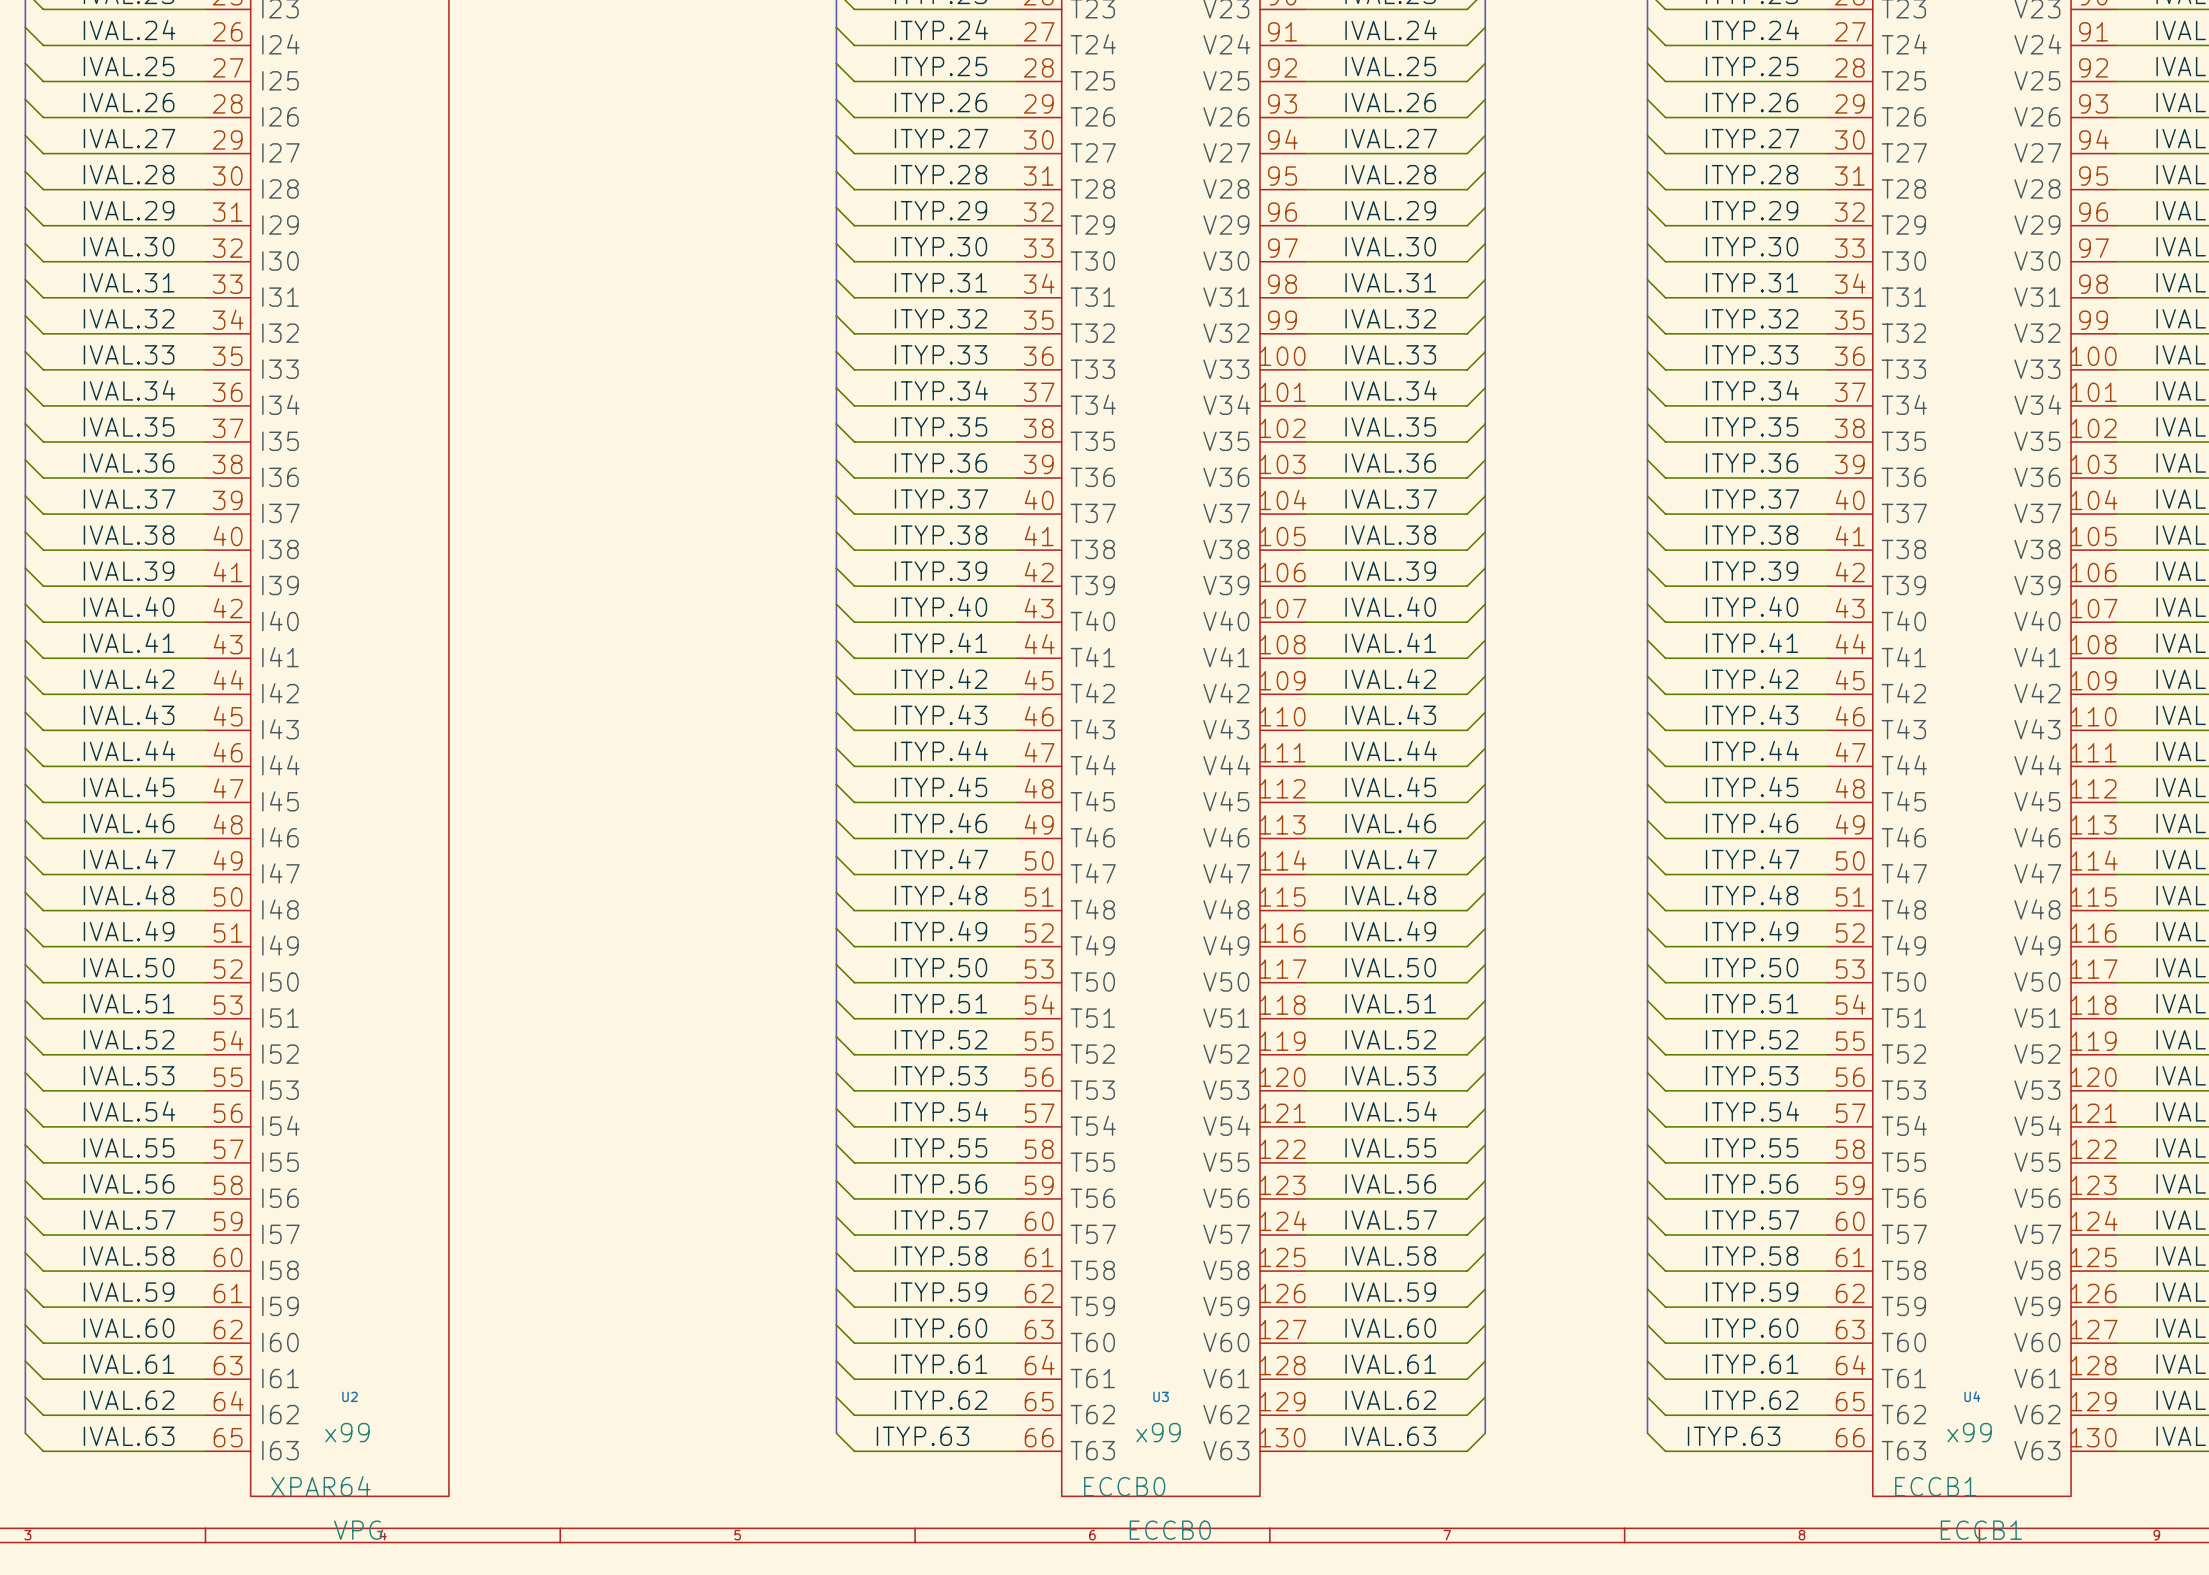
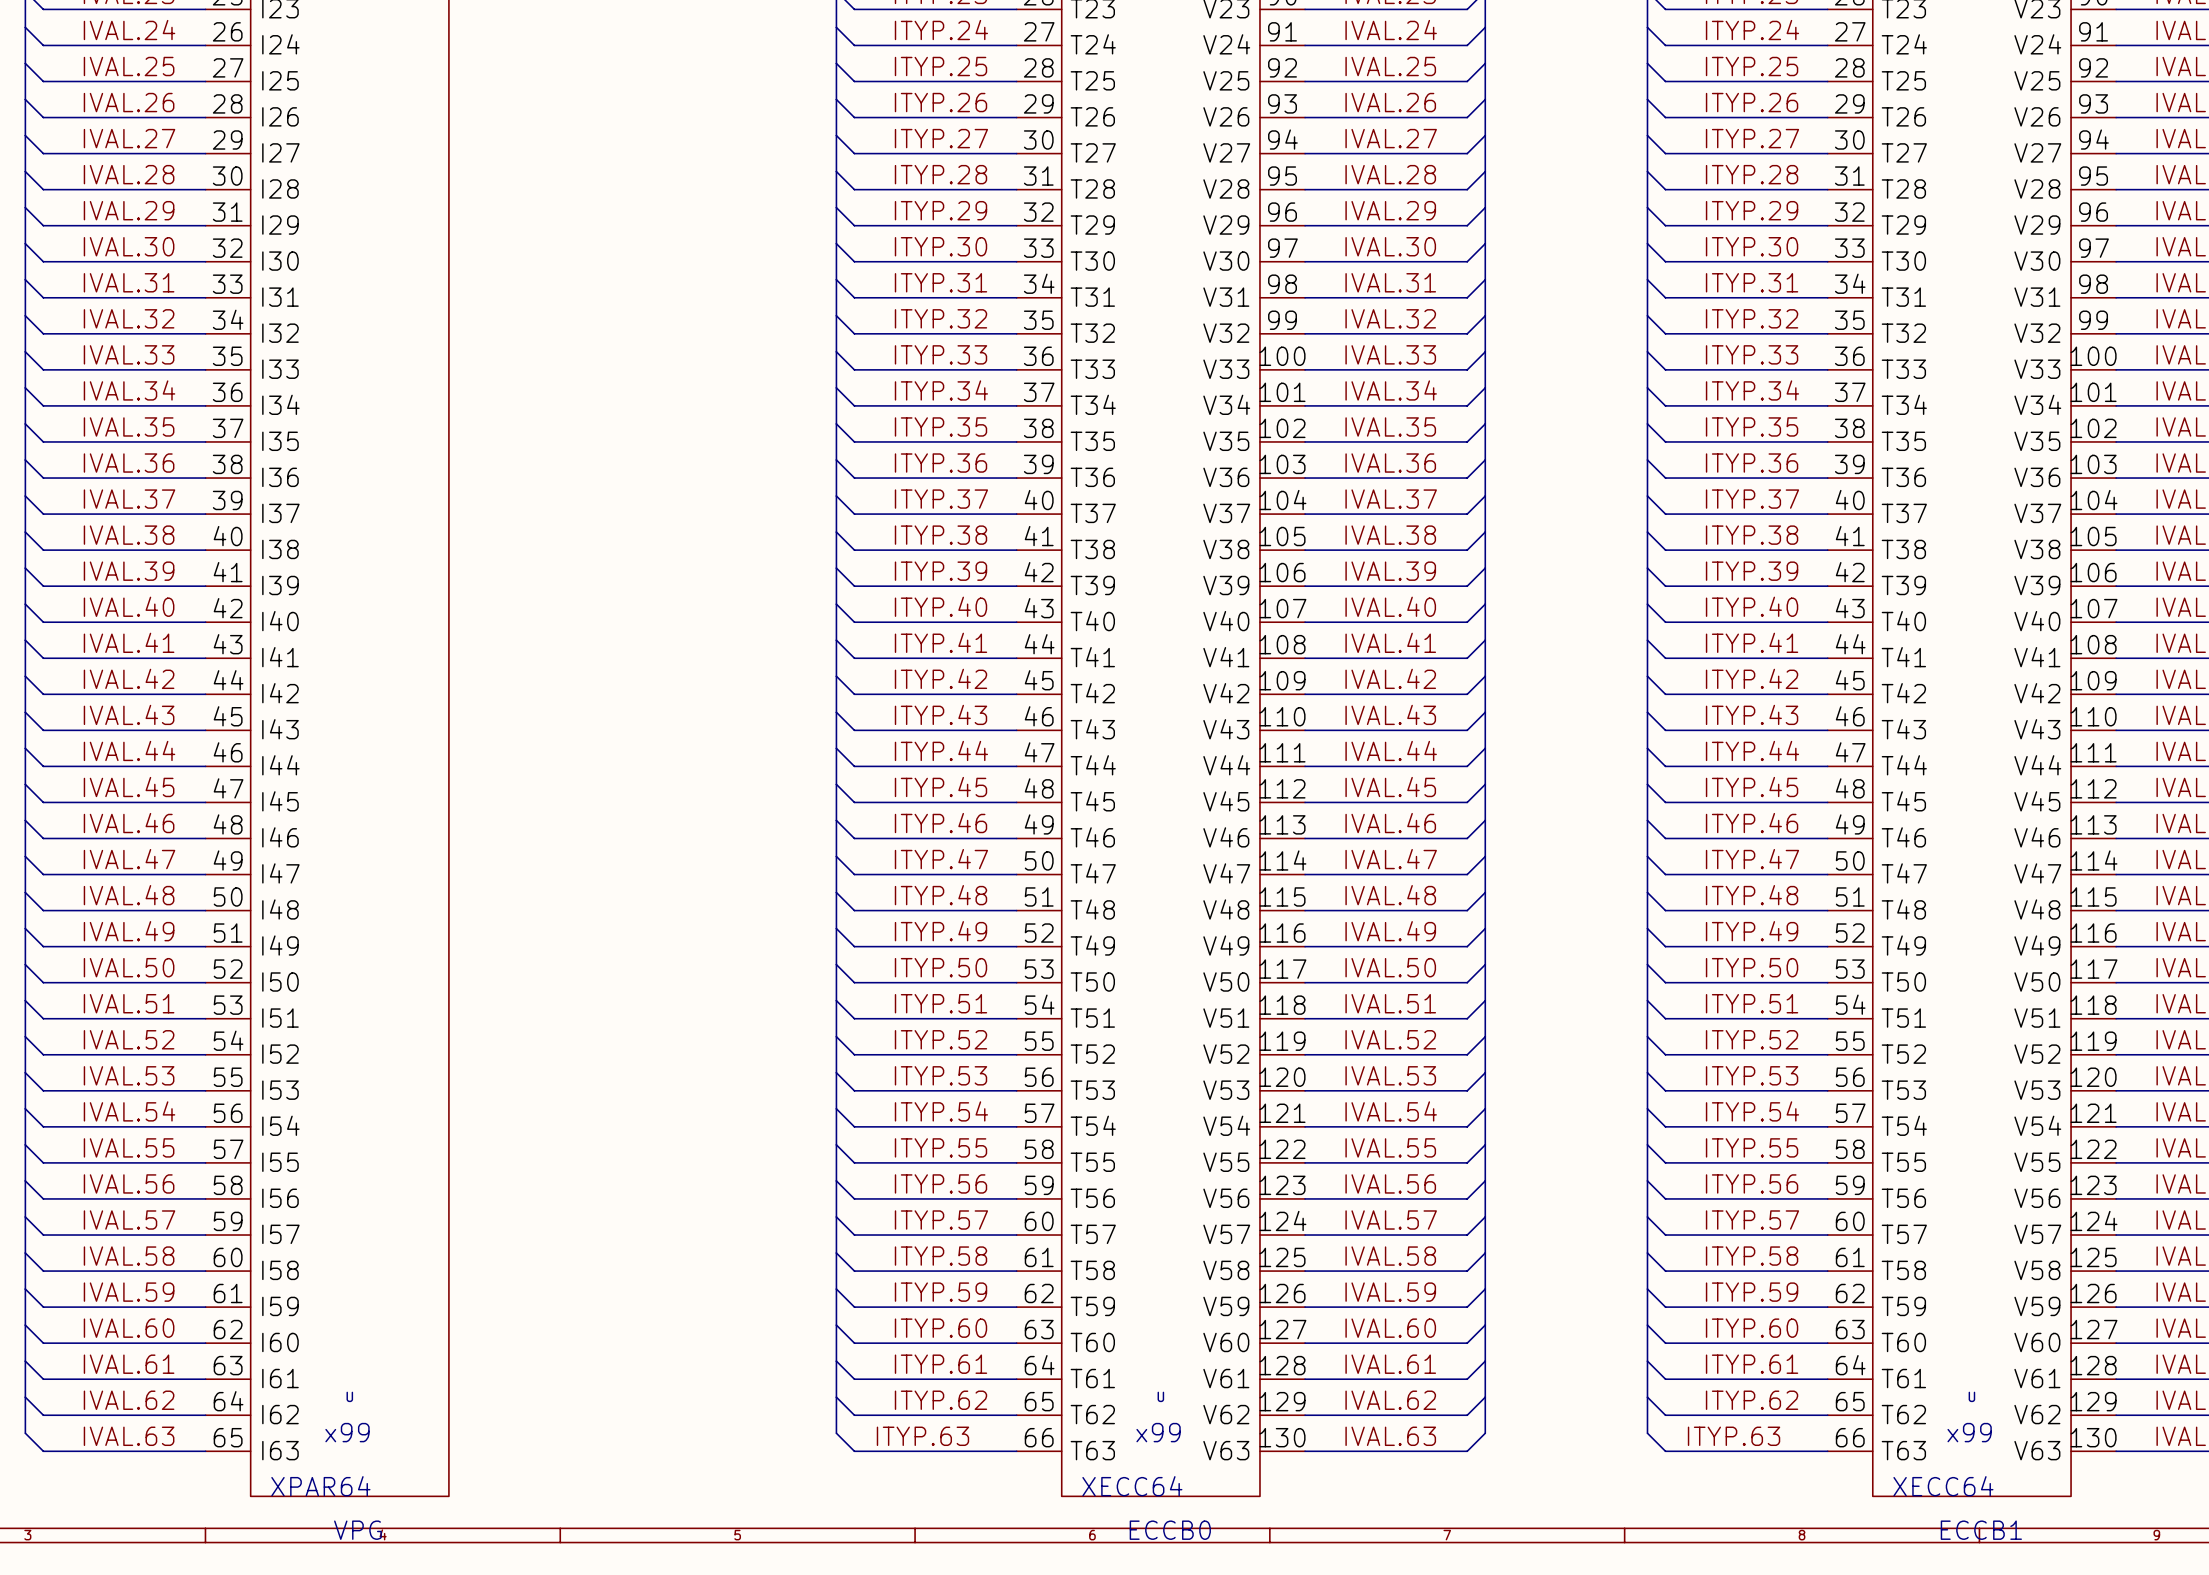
U2 name: U2 (350, 1396) -> U (349, 1396)
U3 name: U3 (1161, 1396) -> U (1160, 1396)
U4 name: U4 (1972, 1396) -> U (1971, 1396)
U3 value: ECCB0 (1124, 1486) -> XECC64 (1132, 1486)
U4 value: ECCB1 (1935, 1486) -> XECC64 (1943, 1486)

